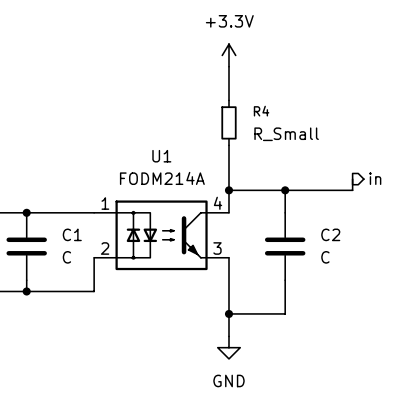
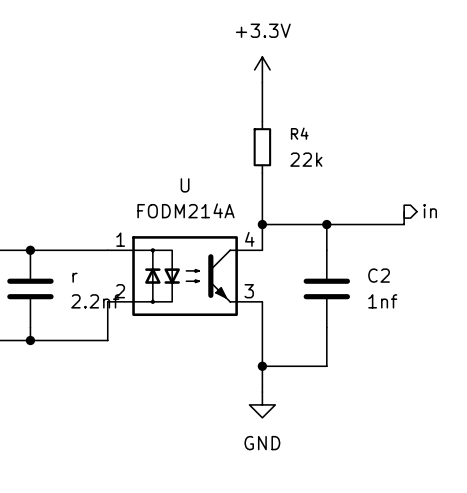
R4 value: R_Small (286, 134) -> 22k (306, 159)
U1 name: U1 (161, 156) -> U (185, 185)
C1 name: C1 (72, 234) -> r (75, 277)
C1 value: C (66, 257) -> 2.2nf (95, 301)
C2 value: C (325, 257) -> 1nf (382, 301)

